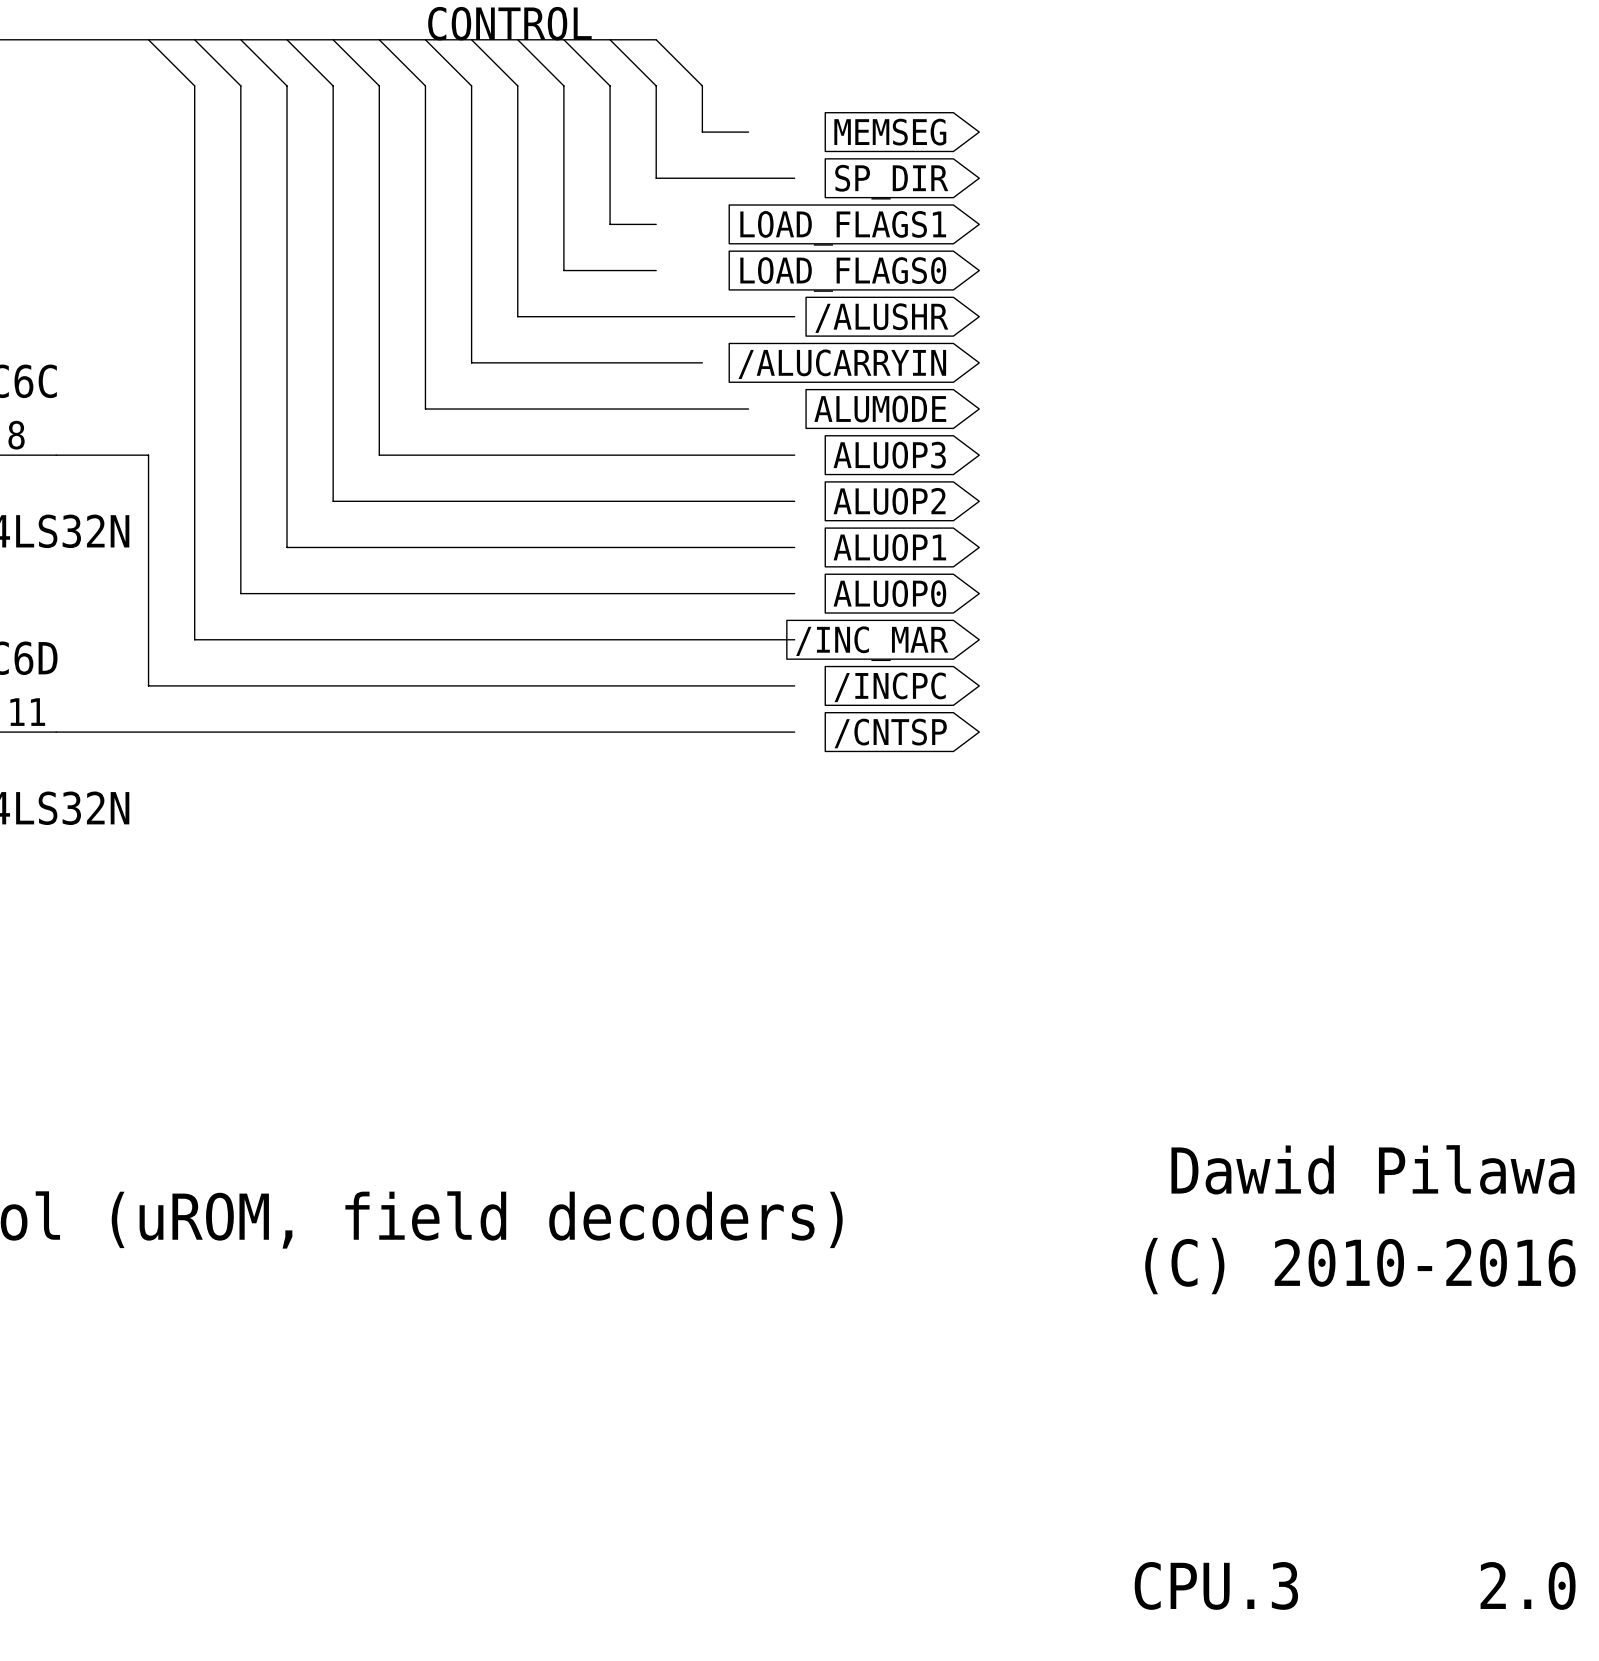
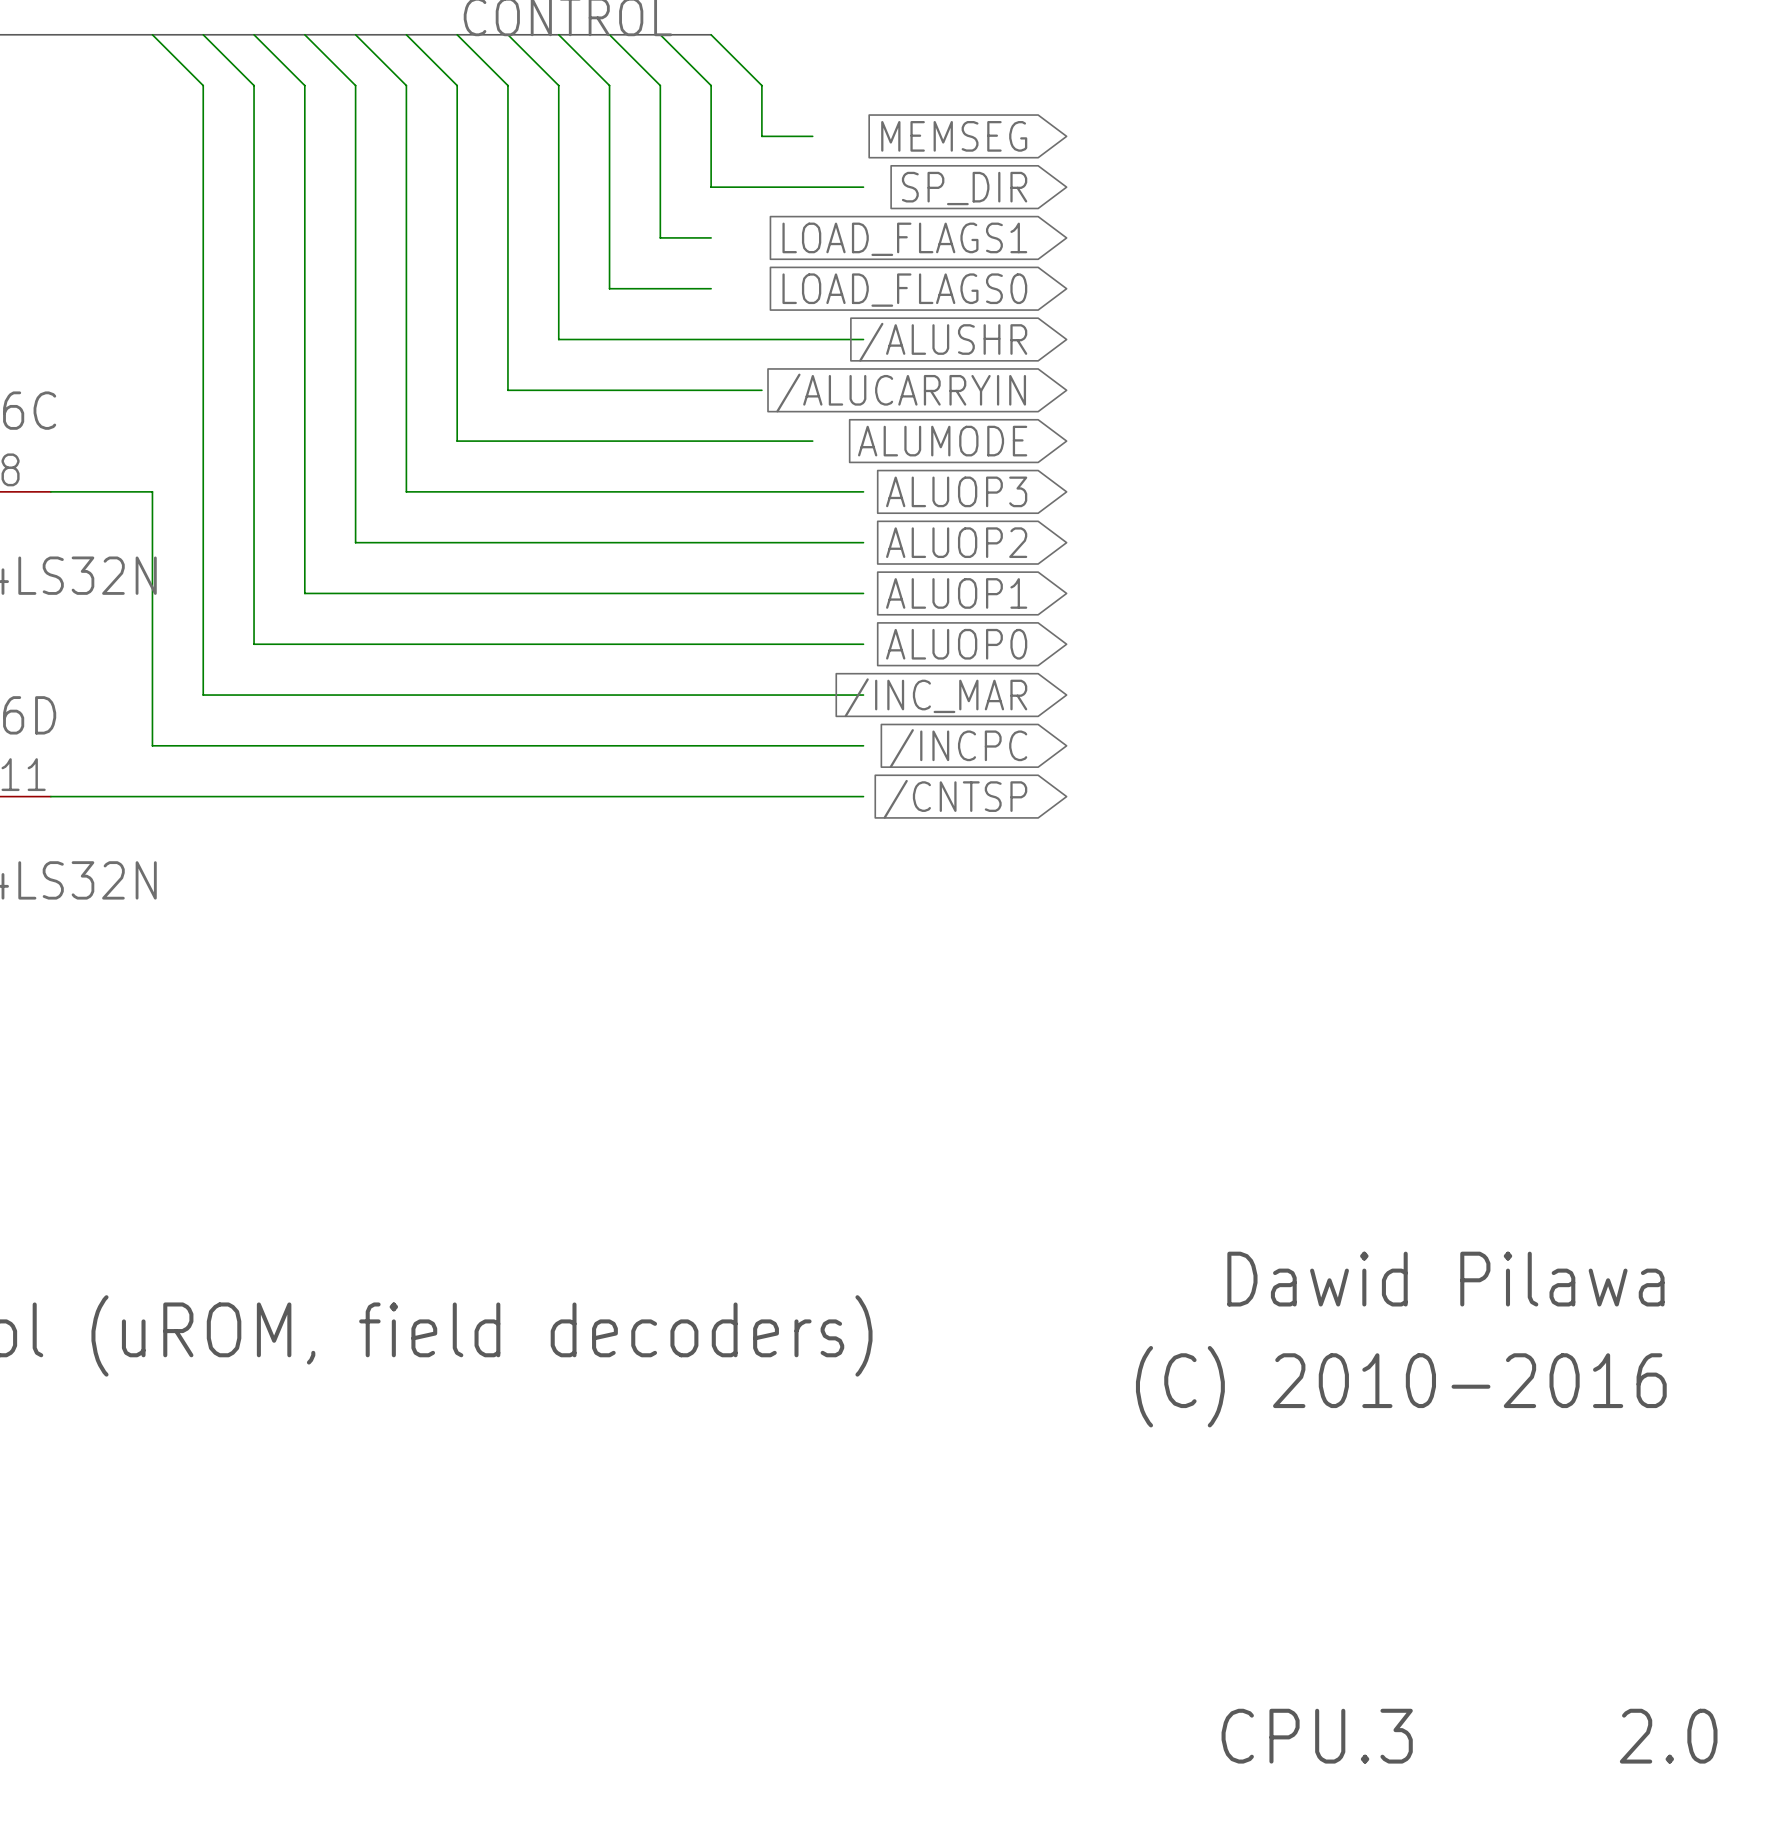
text position: Dawid Pilawa (1372, 1169) -> Dawid Pilawa (1445, 1279)
text position: (C) 2010-2016 (1360, 1266) -> (C) 2010-2016 (1401, 1386)

